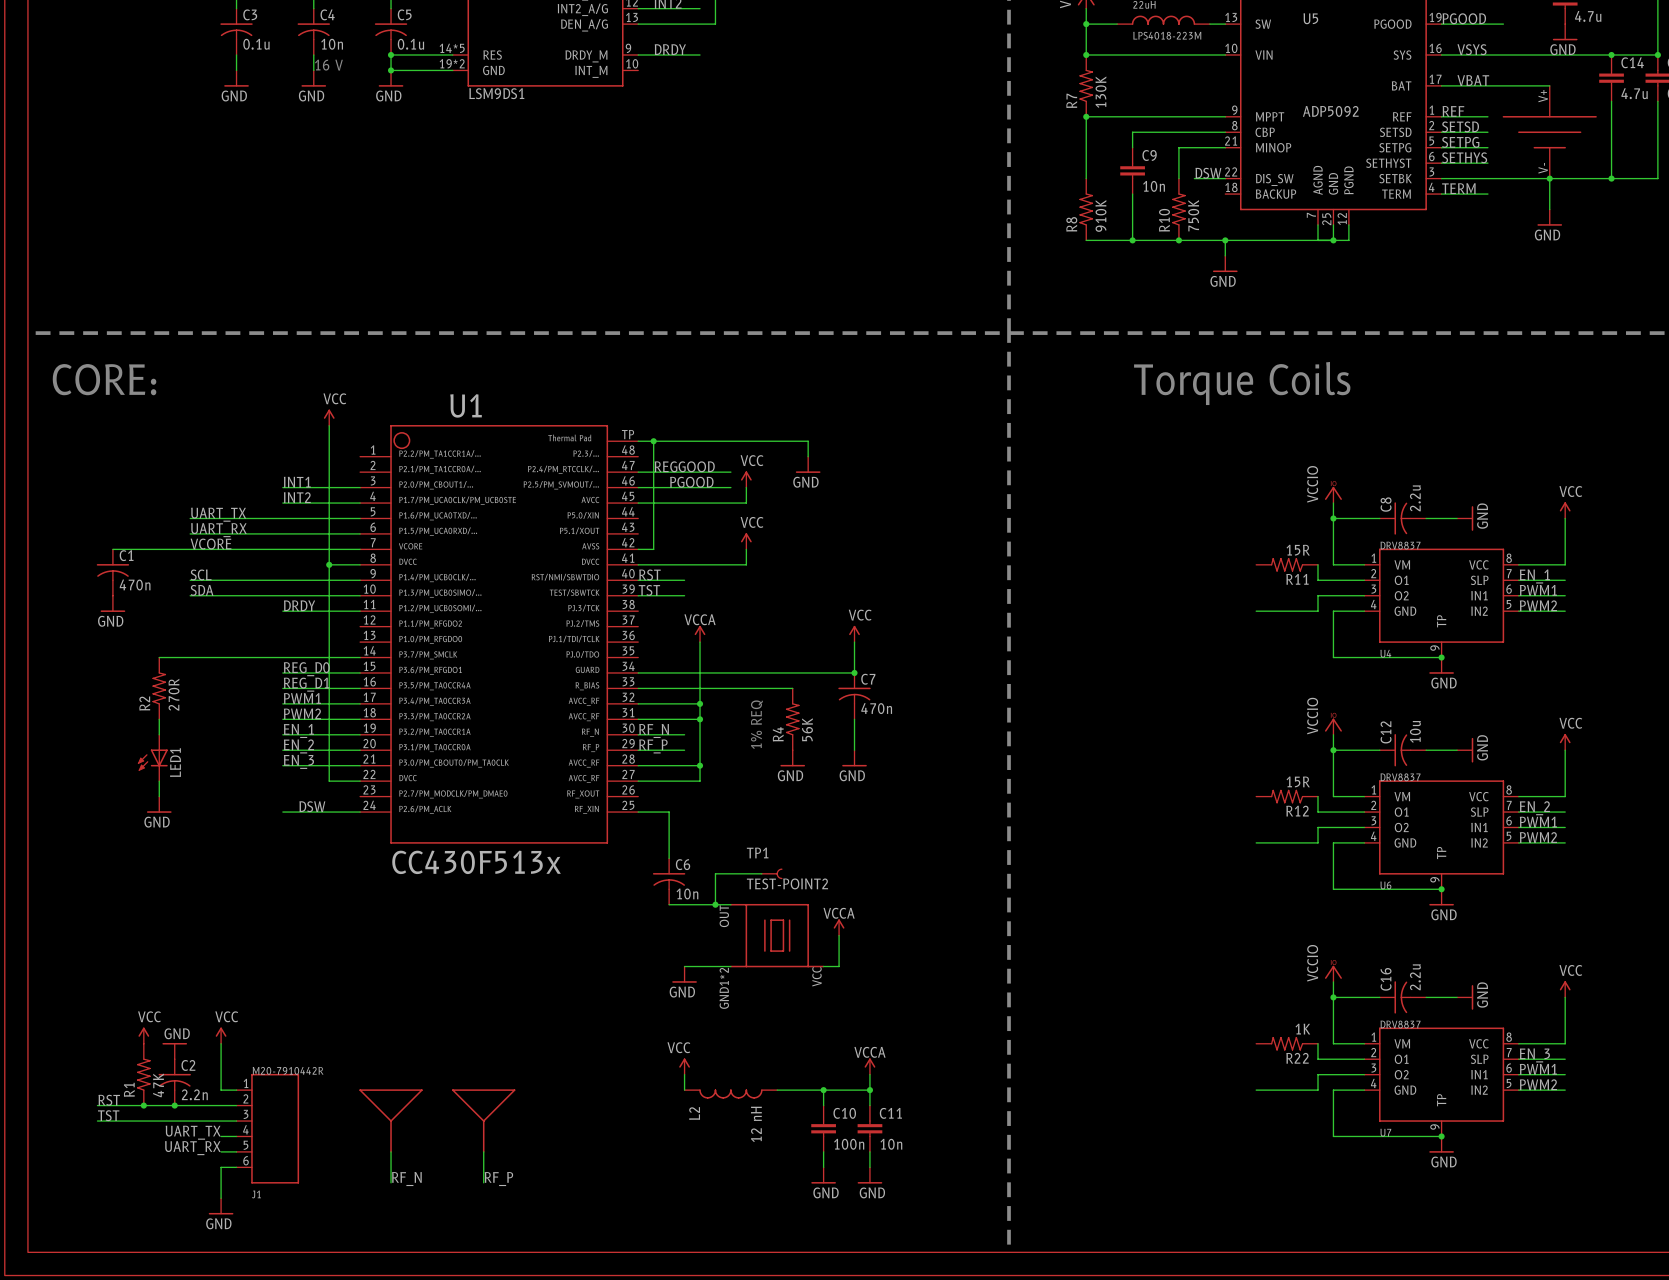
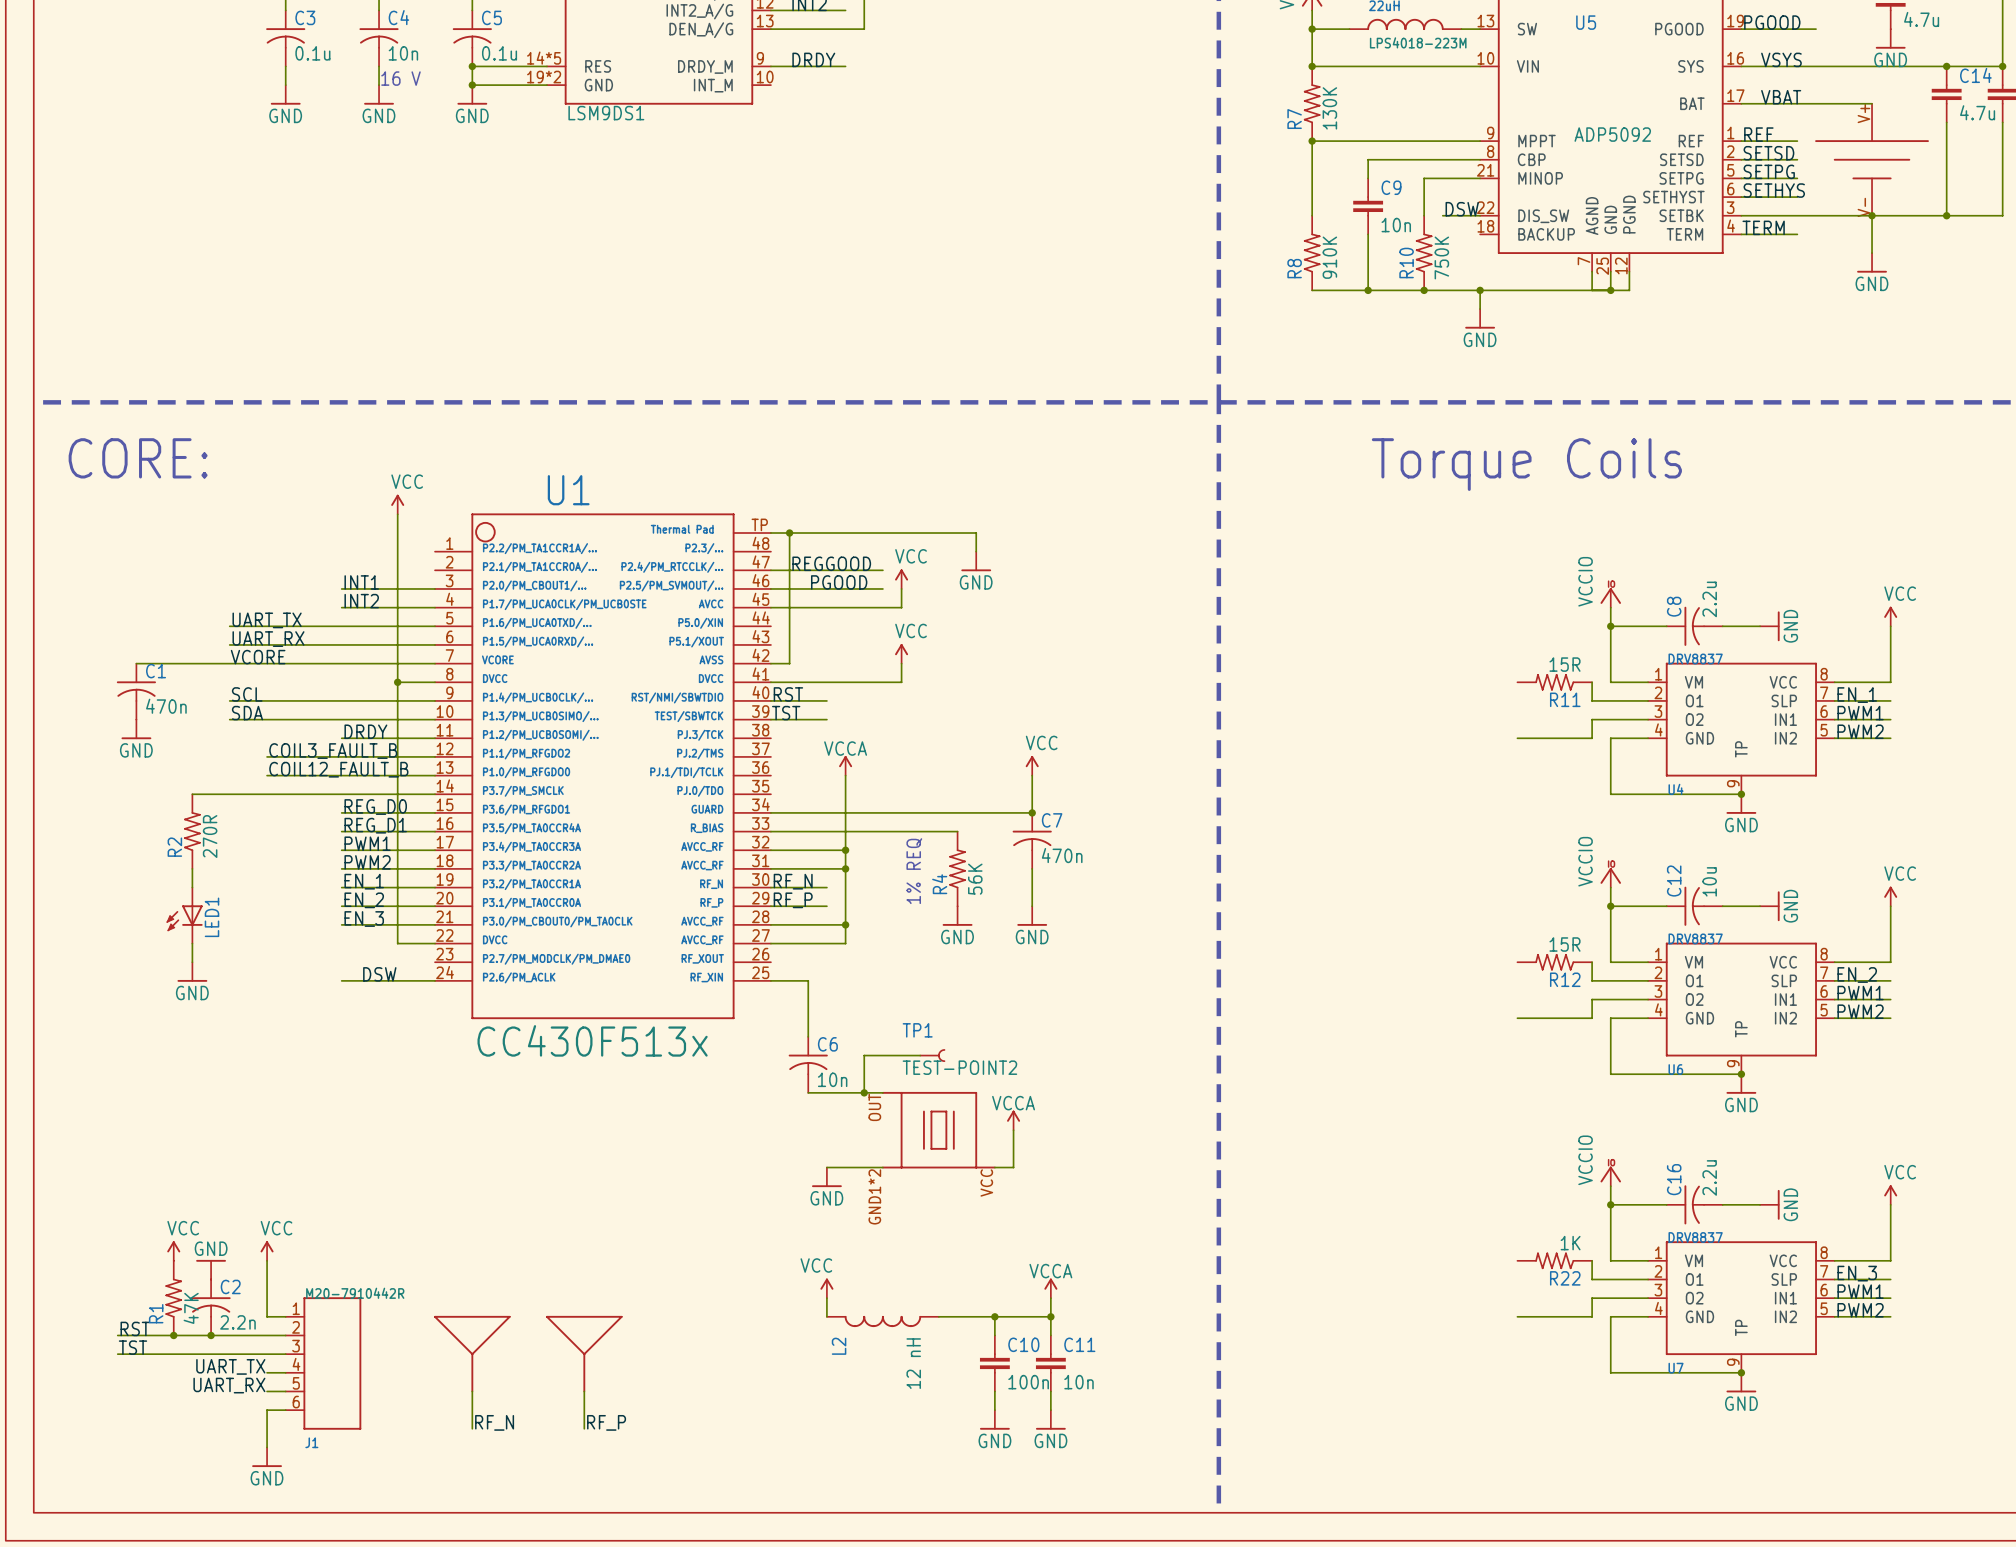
label: none -> COIL3_FAULT_B (333, 751)
wire: none -> (267, 756) (435, 756)
label: none -> COIL12_FAULT_B (338, 769)
wire: none -> (267, 775) (435, 775)

